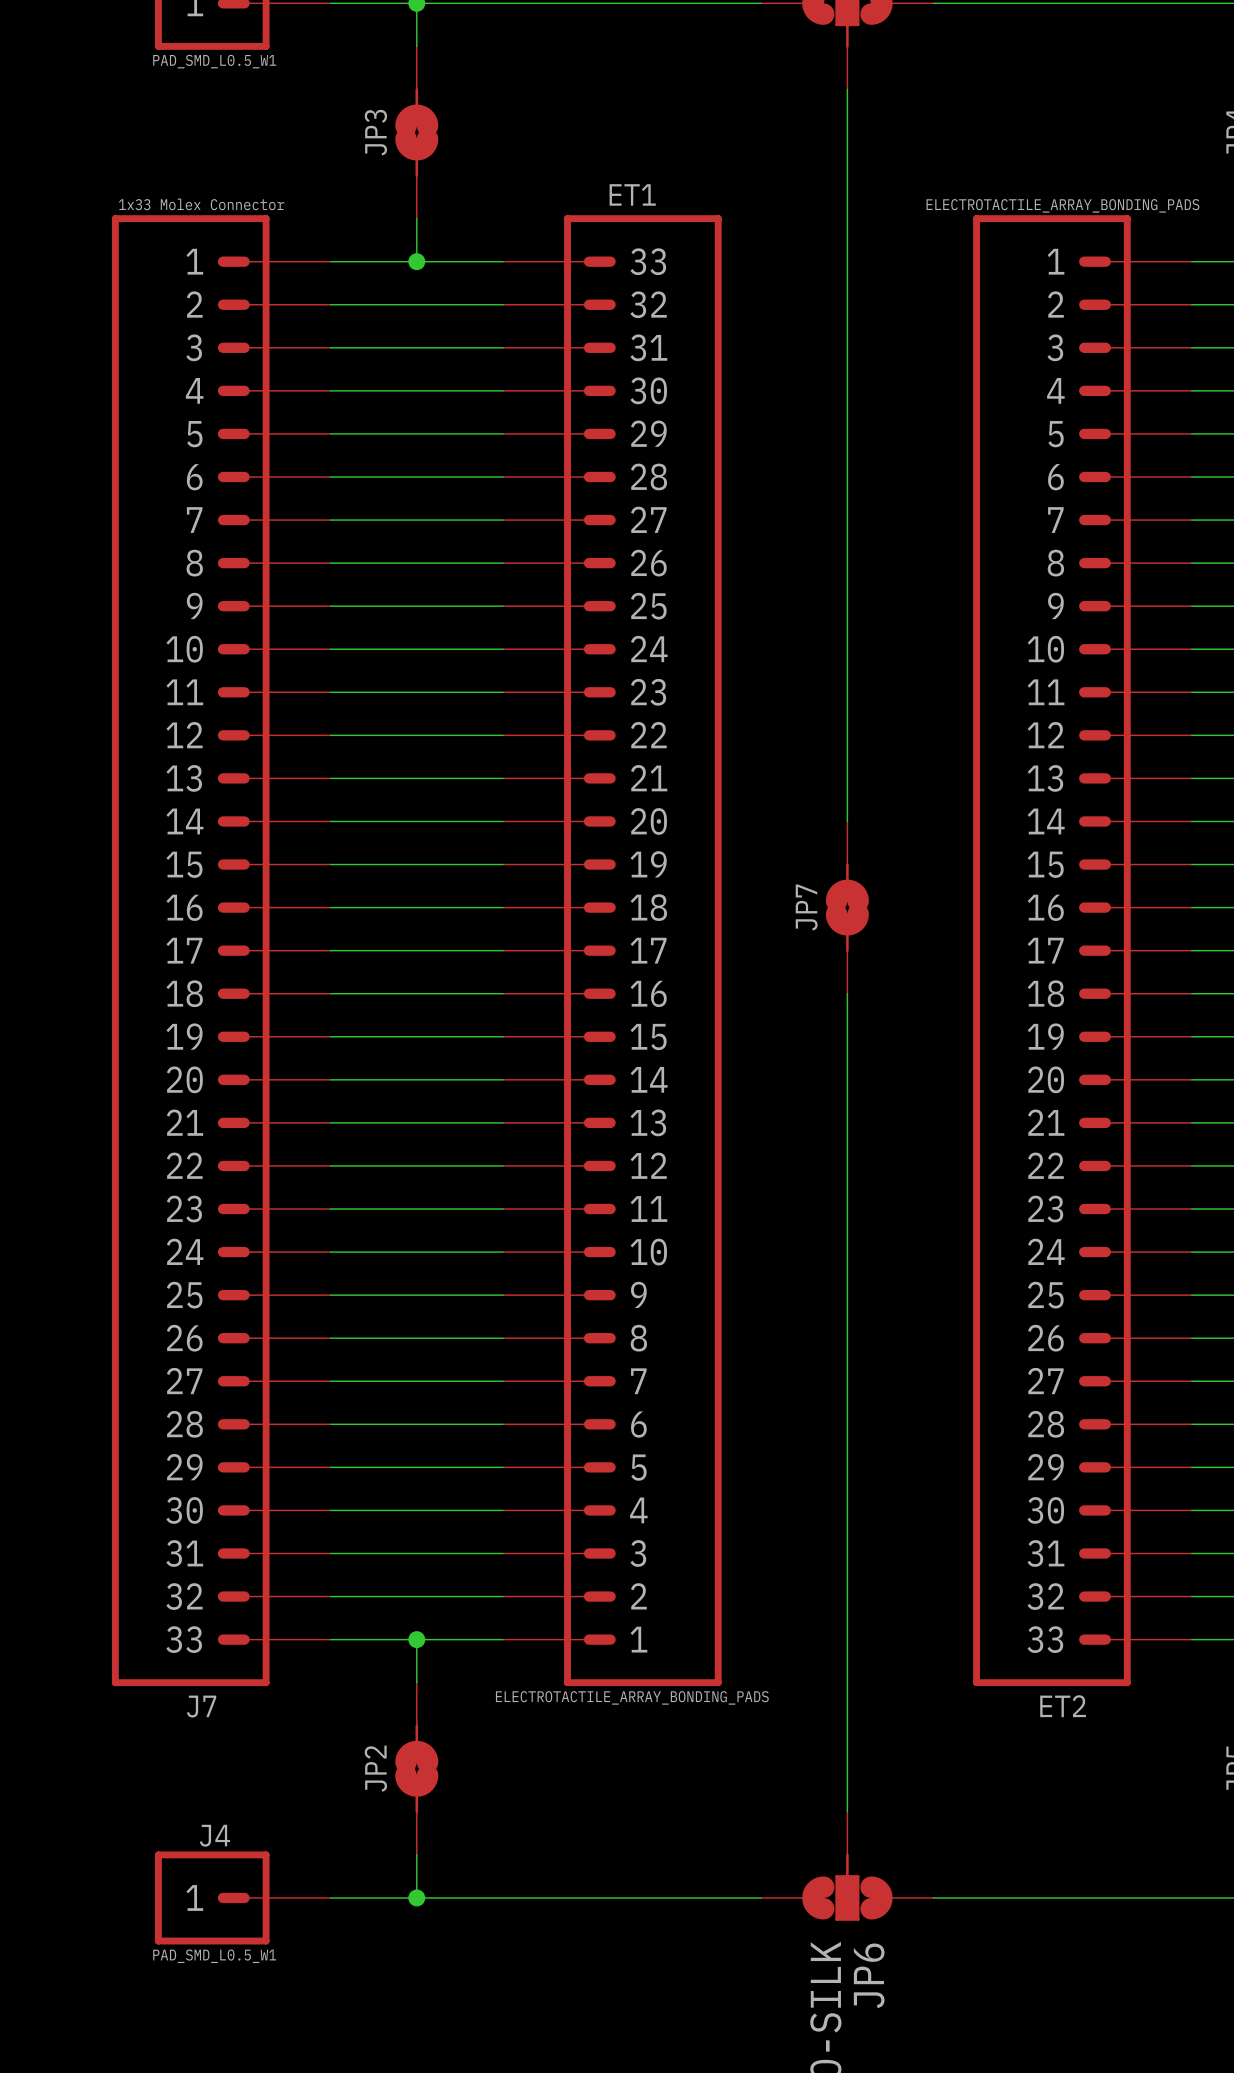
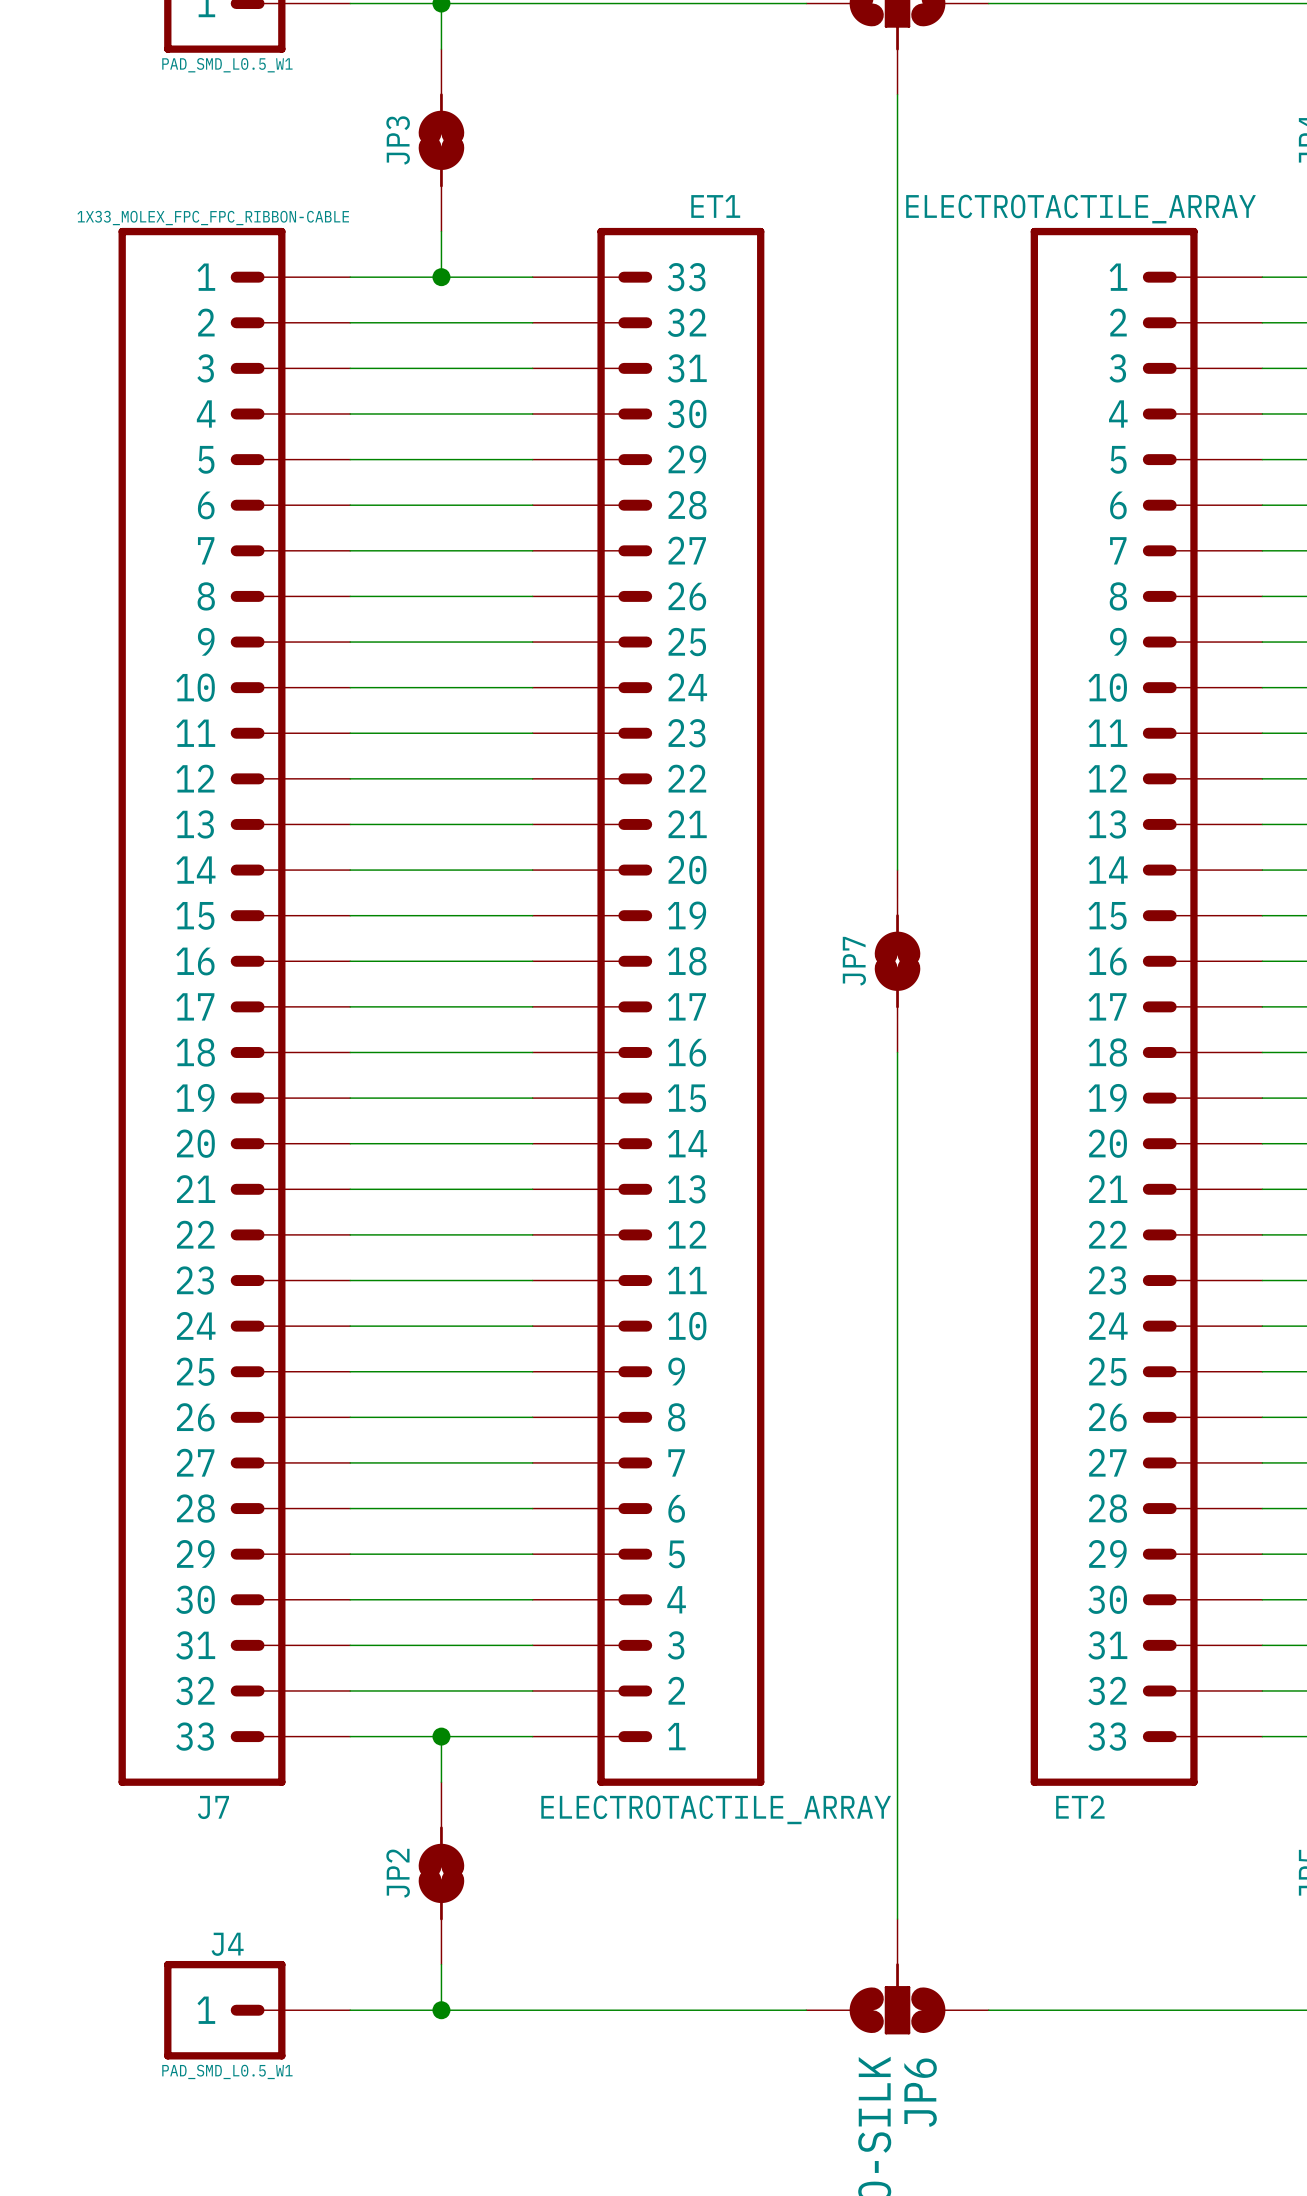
ET1 name position: ET1 (632, 194) -> ET1 (715, 206)
J7 value: 1x33 Molex Connector (201, 204) -> 1X33_MOLEX_FPC_FPC_RIBBON-CABLE (213, 218)
ET2 value: ELECTROTACTILE_ARRAY_BONDING_PADS (1062, 205) -> ELECTROTACTILE_ARRAY (1081, 209)
ET1 value: ELECTROTACTILE_ARRAY_BONDING_PADS (632, 1697) -> ELECTROTACTILE_ARRAY (716, 1809)
ET2 name position: ET2 (1063, 1706) -> ET2 (1080, 1807)

